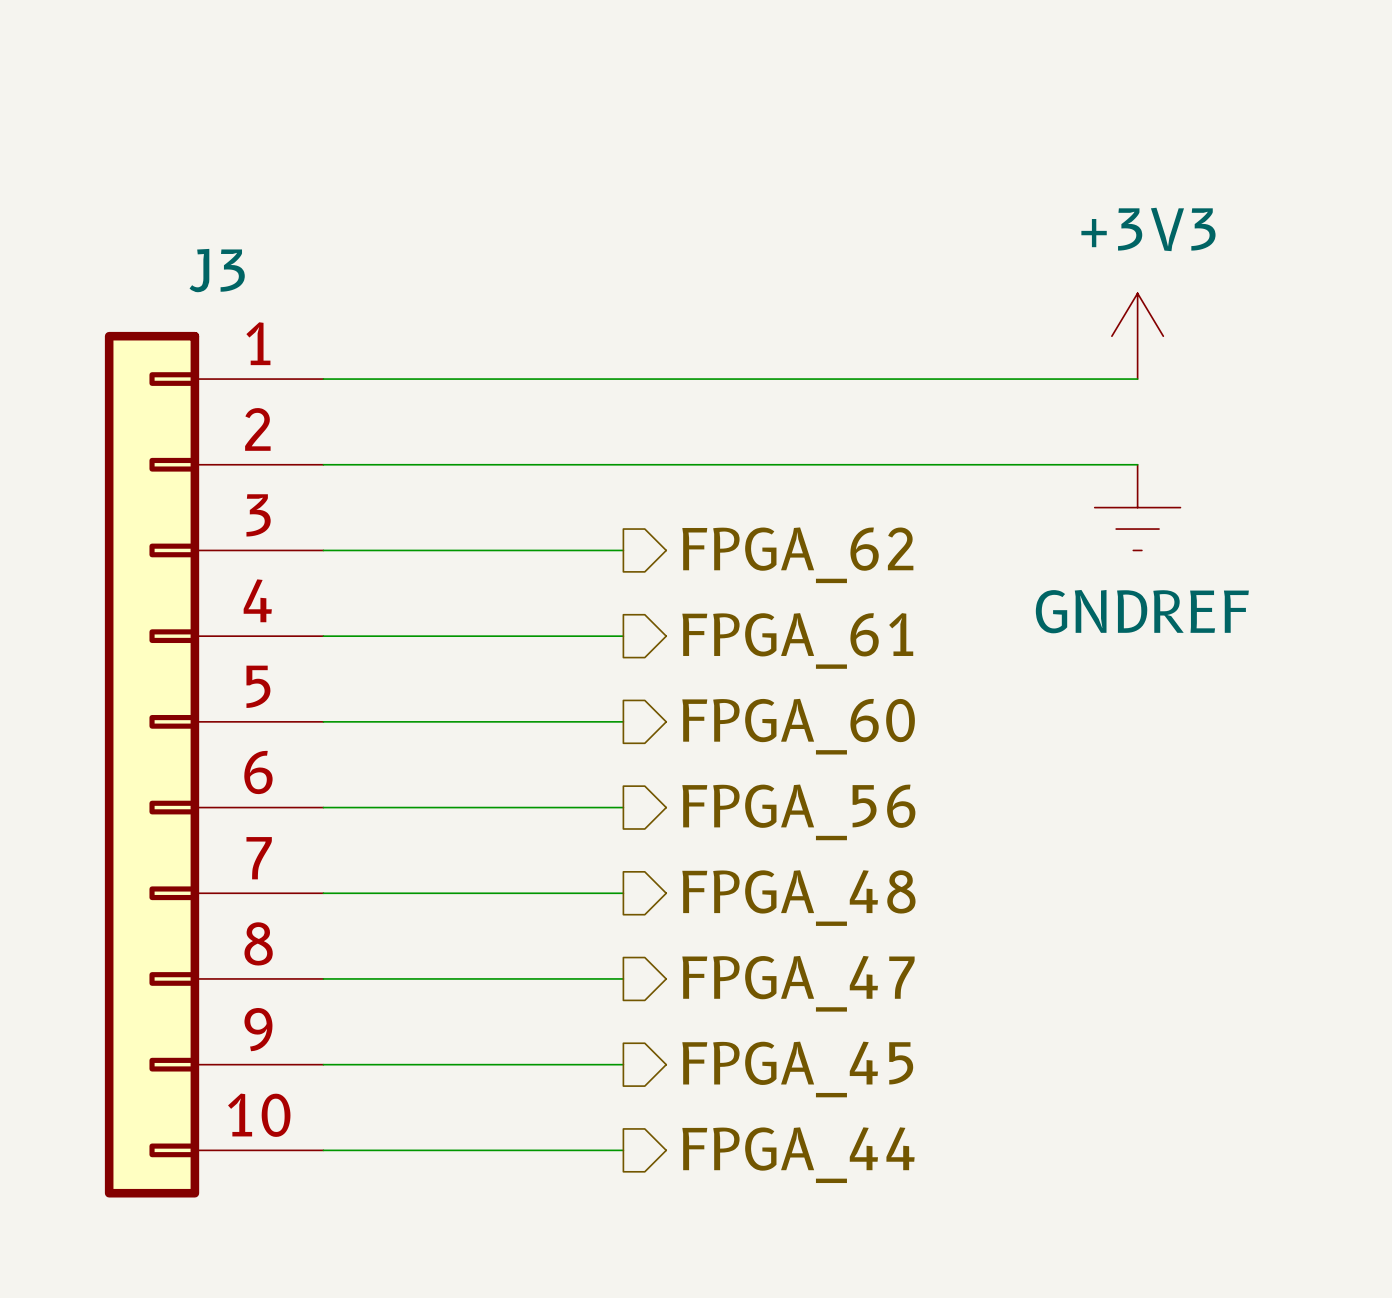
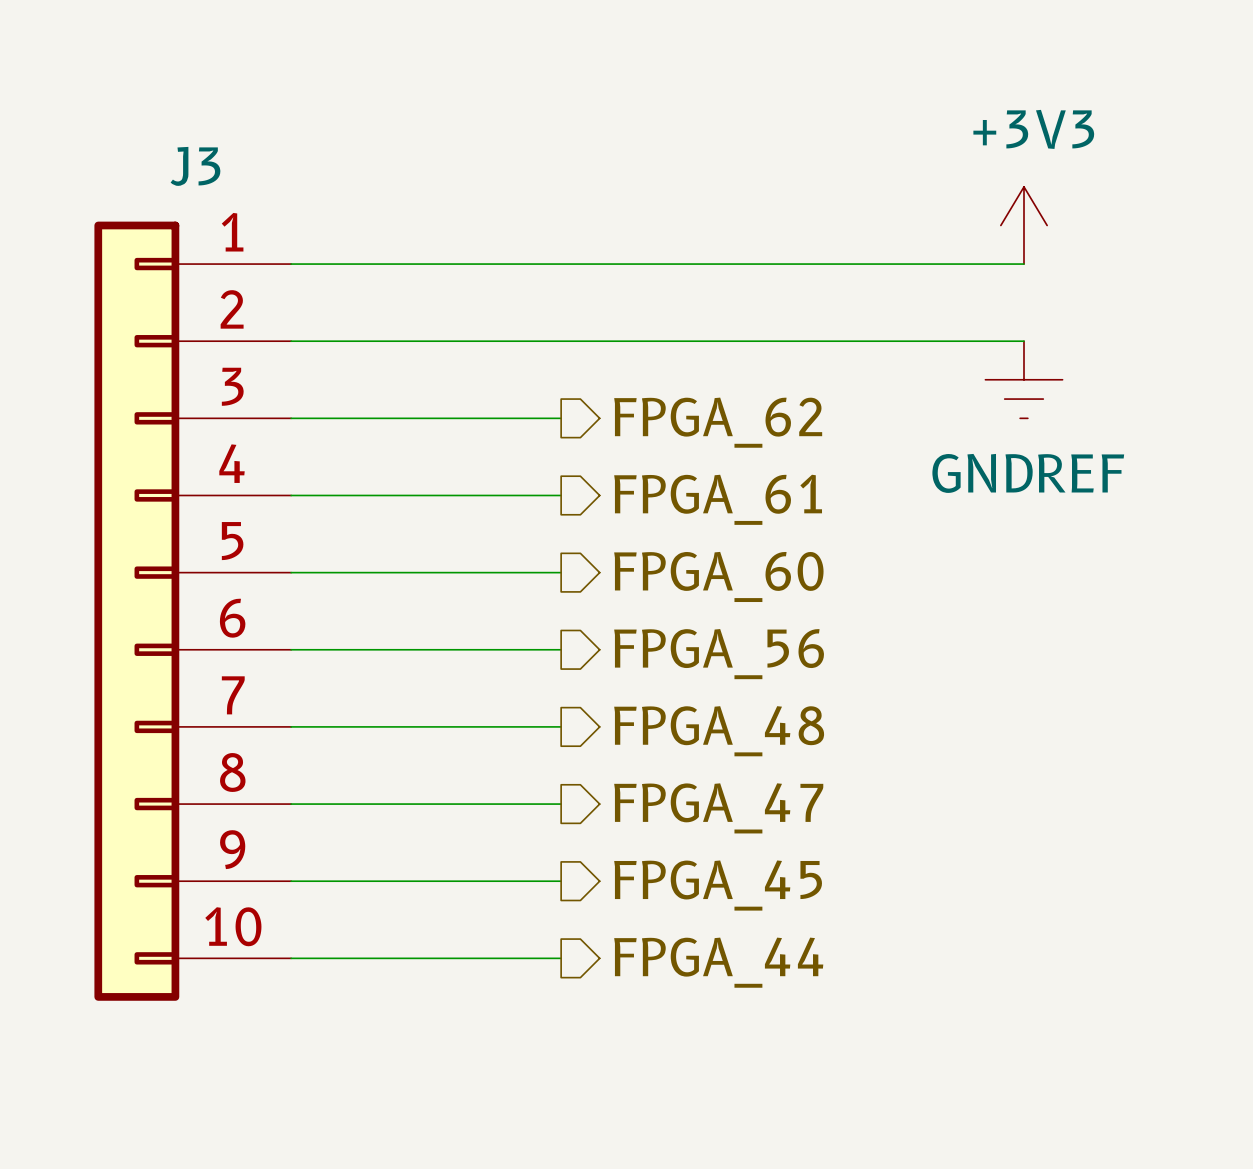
wire: none -> (291, 264) (1024, 264)
power symbol position: +3V3 (1137, 336) -> +3V3 (1024, 225)
wire: (623, 464) (1137, 464) -> none
hierarchical label: none -> FPGA_62 (718, 422)
power symbol position: GNDREF (1137, 507) -> GNDREF (1024, 379)
hierarchical label: FPGA_62 (797, 555) -> FPGA_61 (718, 499)
hierarchical label: FPGA_61 (797, 640) -> FPGA_60 (718, 576)
hierarchical label: FPGA_60 (798, 726) -> FPGA_56 (719, 654)
J3 position: (214, 764) -> (192, 611)
hierarchical label: FPGA_56 (798, 812) -> FPGA_48 (719, 731)
hierarchical label: FPGA_48 (798, 898) -> FPGA_47 (718, 808)
hierarchical label: FPGA_47 (798, 983) -> FPGA_45 (718, 885)
hierarchical label: FPGA_45 (797, 1069) -> FPGA_44 (718, 962)
wire: (323, 1150) (623, 1150) -> none
hierarchical label: FPGA_44 (798, 1155) -> none

